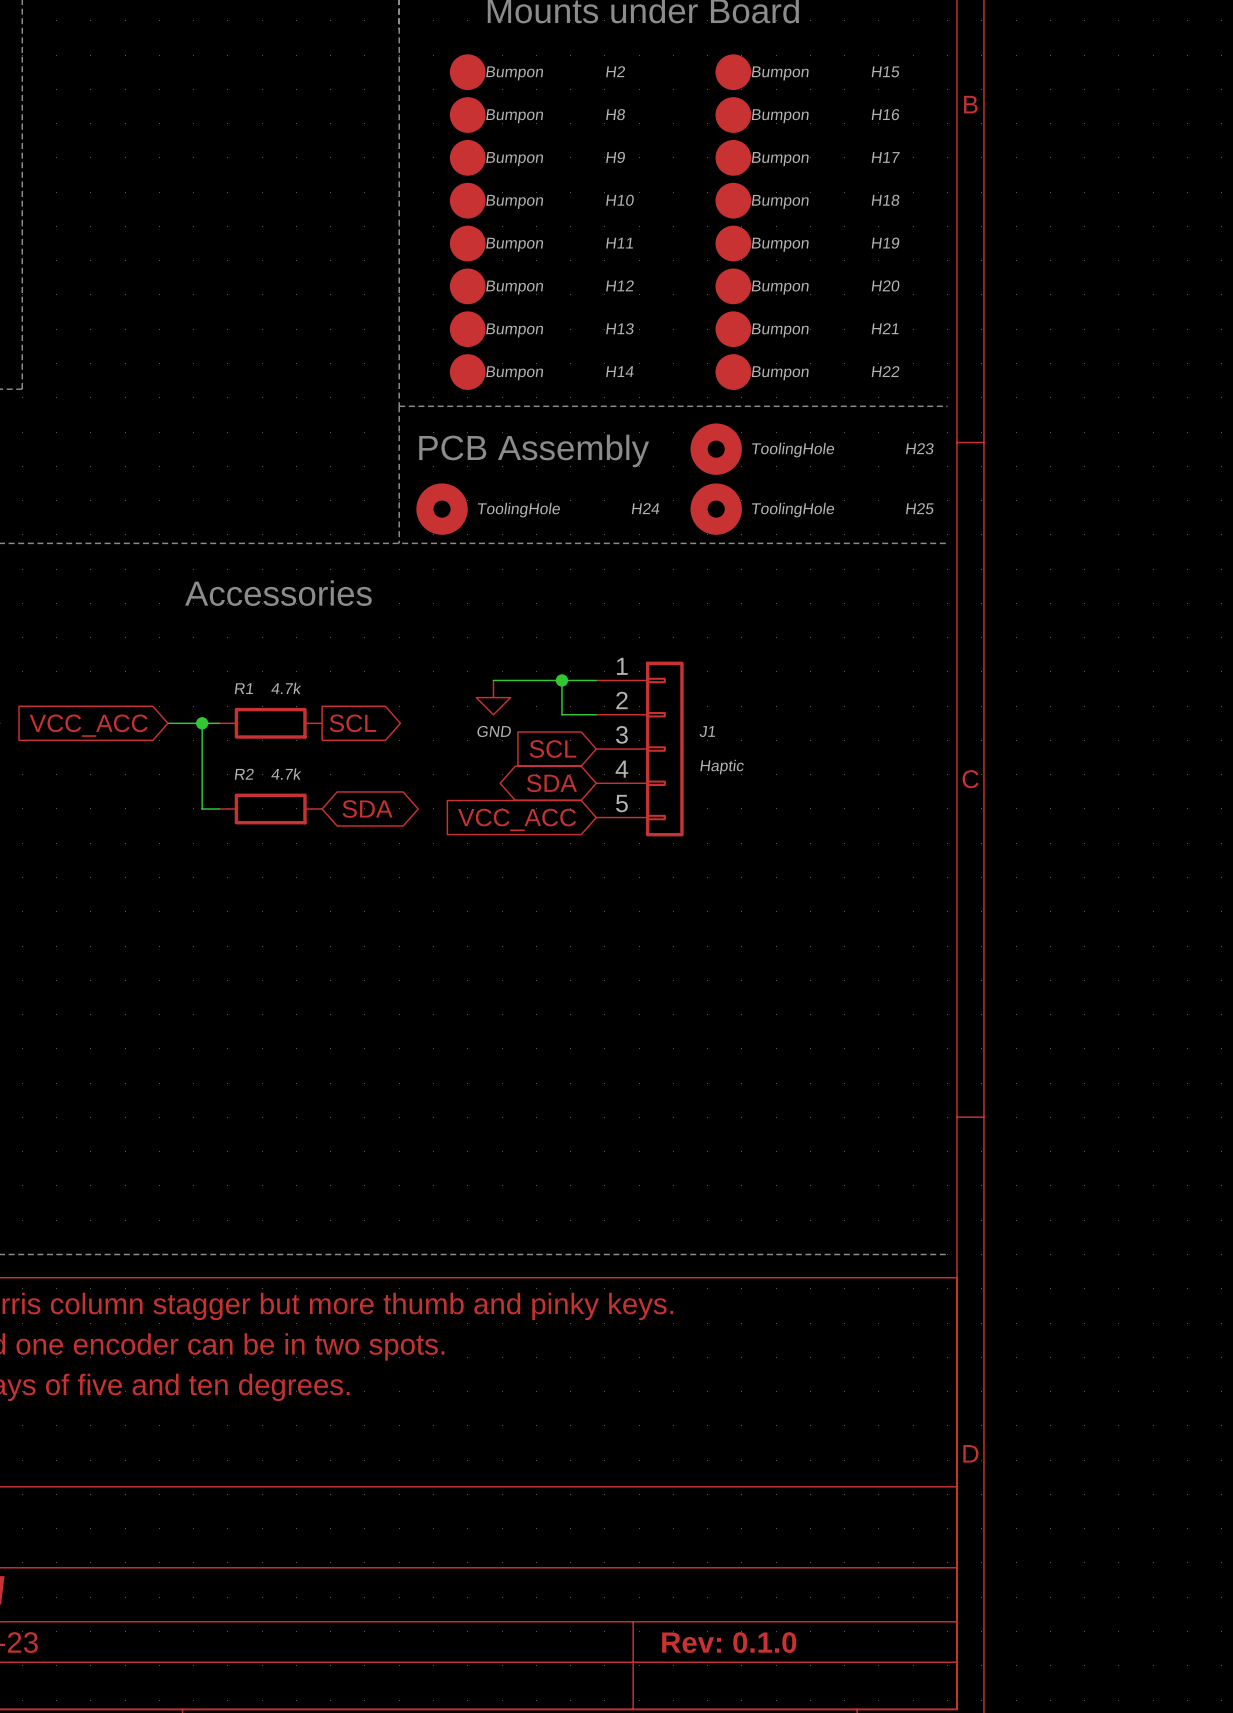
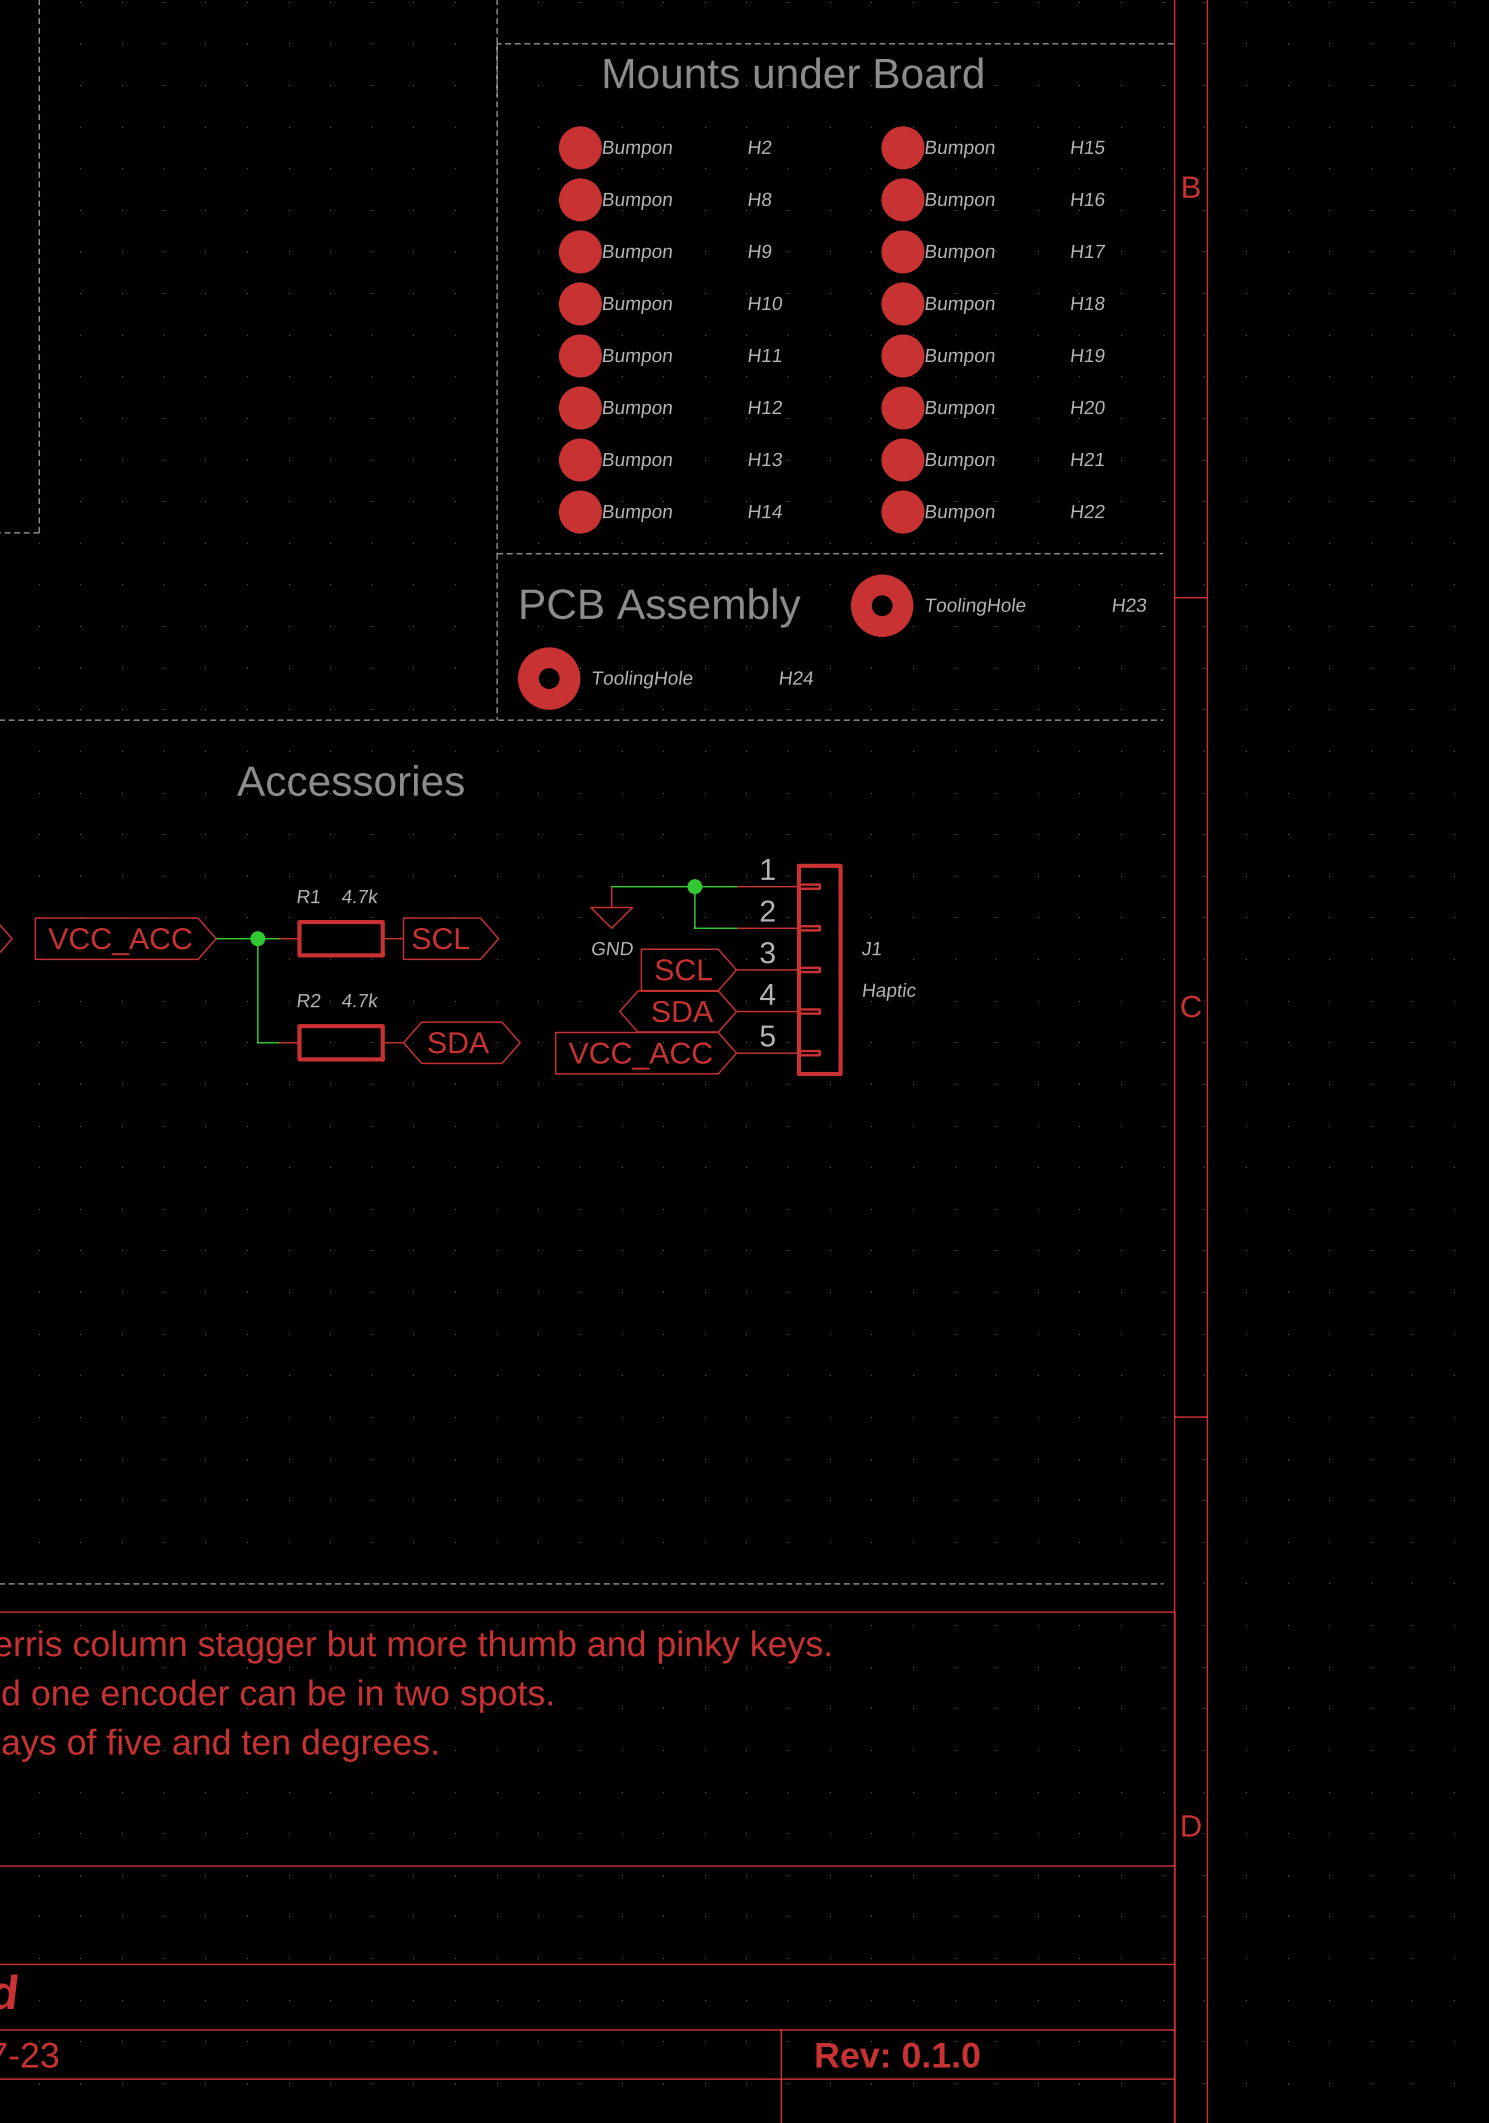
H25: ToolingHole (716, 509) -> none

